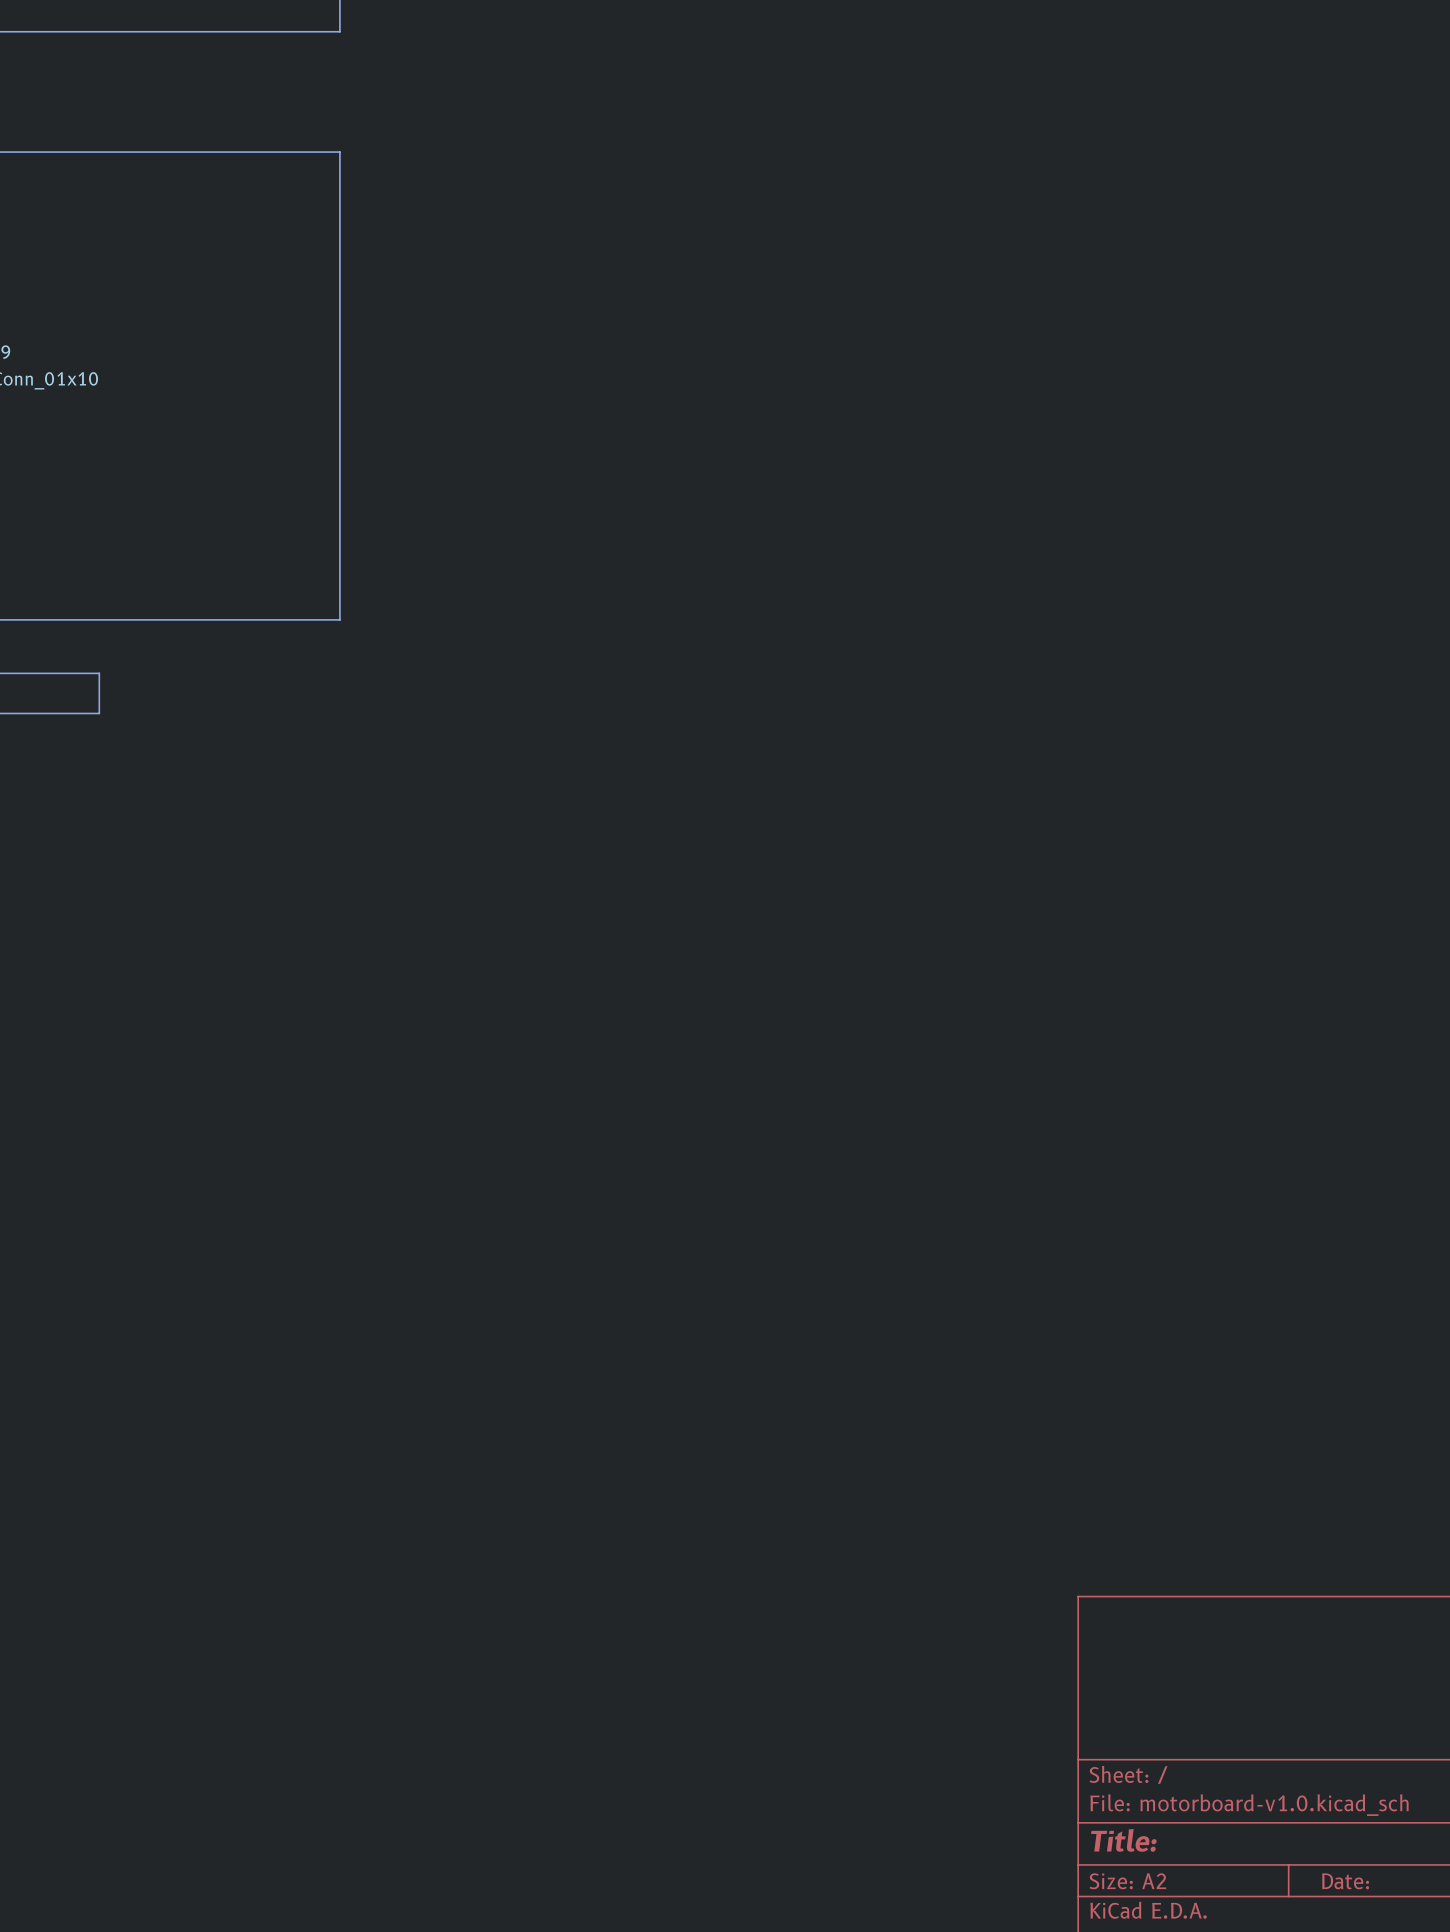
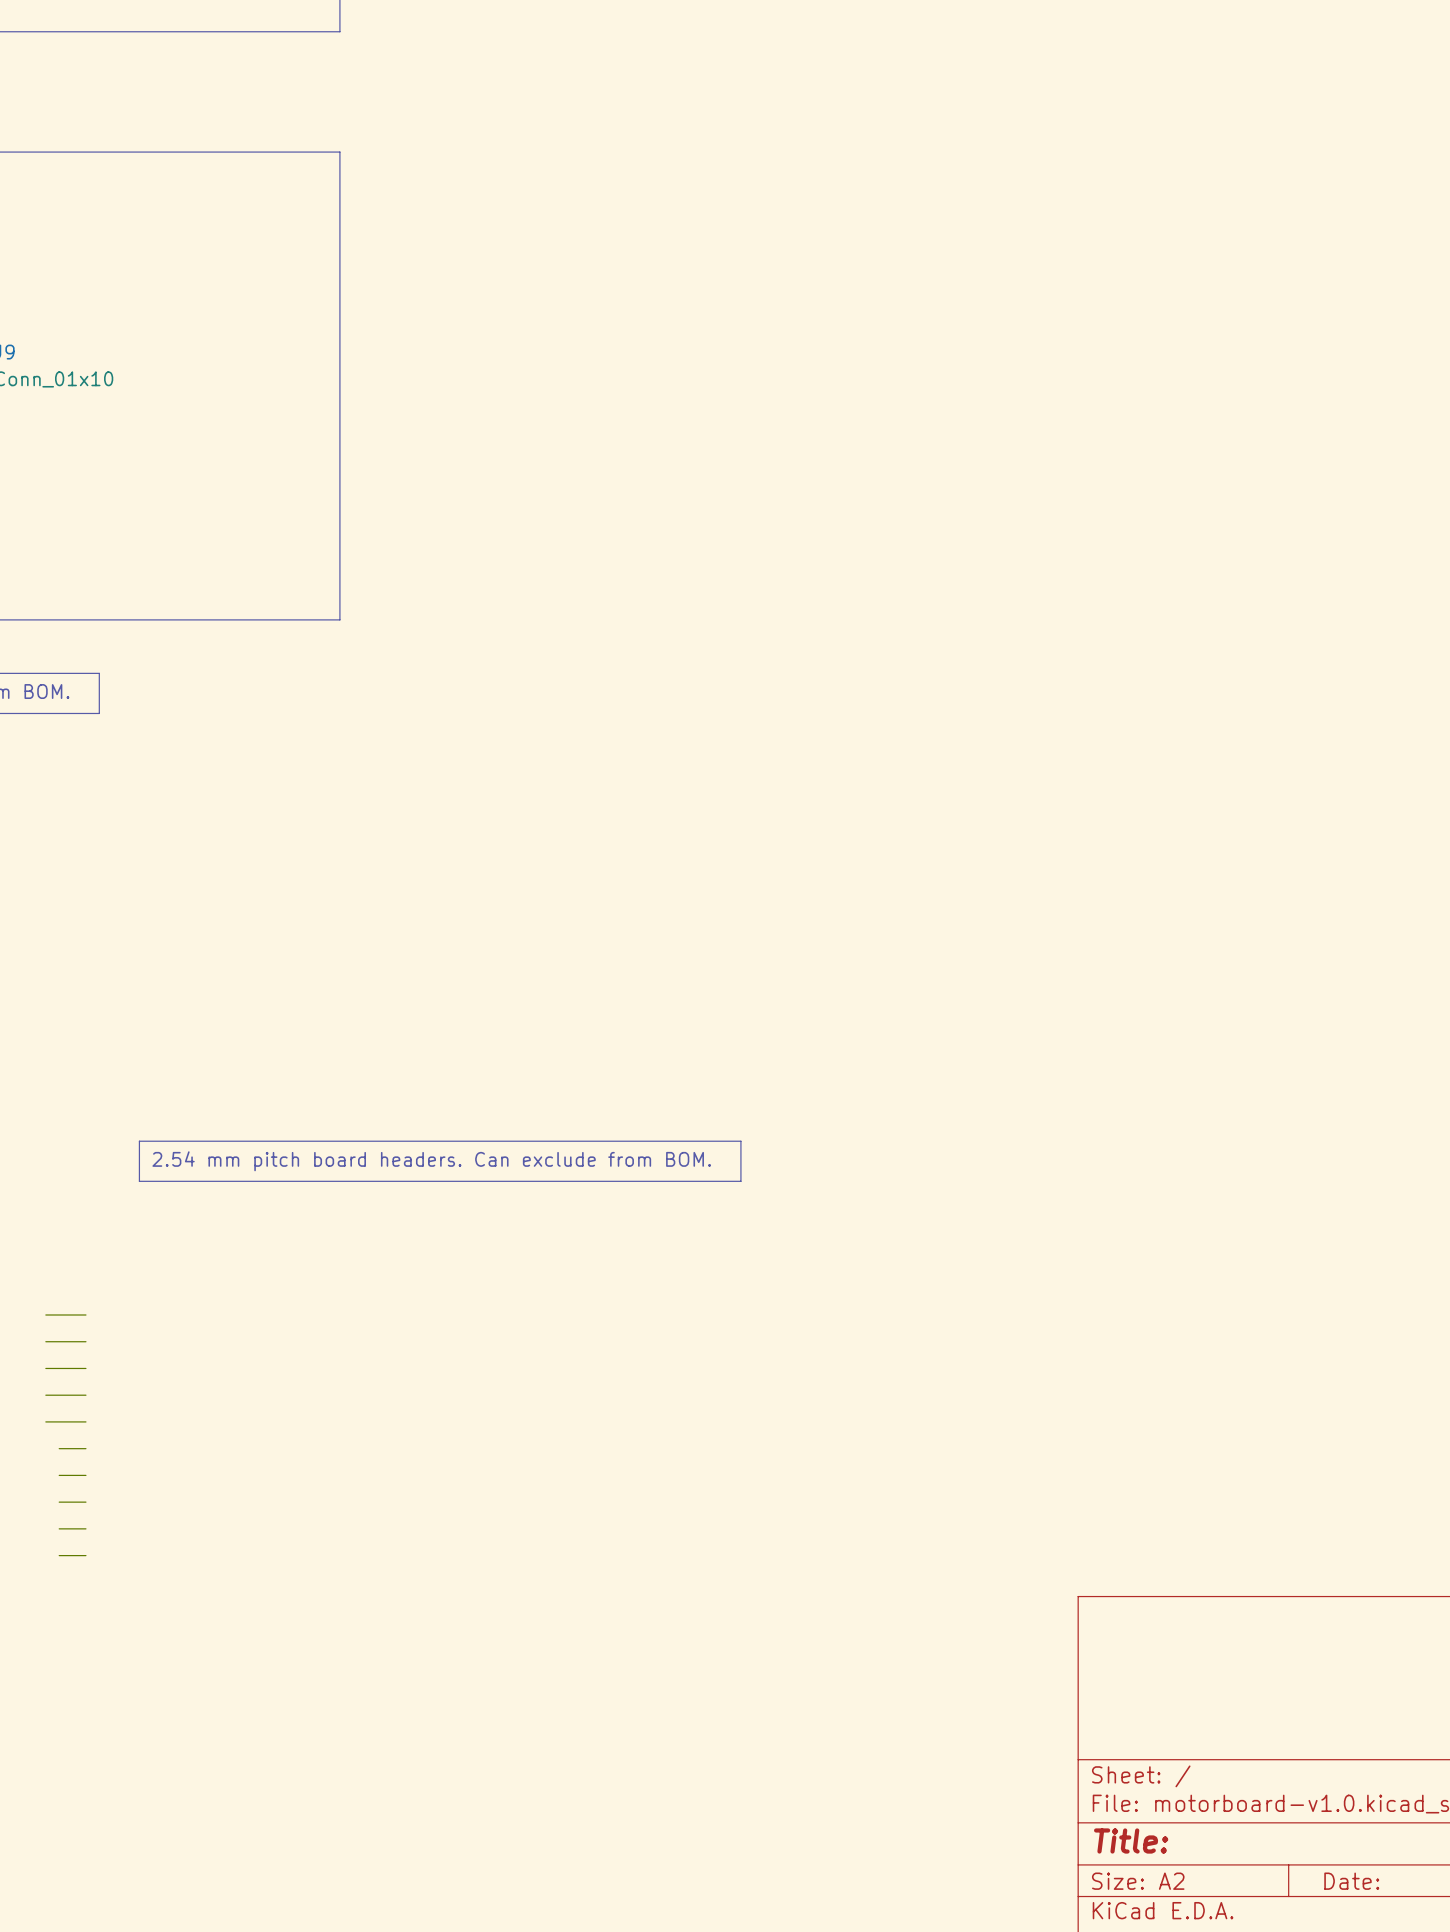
line: none -> (139, 1141) (740, 1141) (740, 1181) (139, 1181) (139, 1141)
text: none -> 2.54 mm pitch board headers. Can exclude from BOM. (431, 1161)
wire: none -> (45, 1314) (85, 1314)
wire: none -> (45, 1341) (85, 1341)
wire: none -> (45, 1368) (85, 1368)
wire: none -> (45, 1395) (85, 1395)
wire: none -> (45, 1421) (85, 1421)
wire: none -> (59, 1448) (85, 1448)
wire: none -> (59, 1475) (85, 1475)
wire: none -> (59, 1502) (85, 1502)
wire: none -> (59, 1528) (85, 1528)
wire: none -> (59, 1555) (85, 1555)

